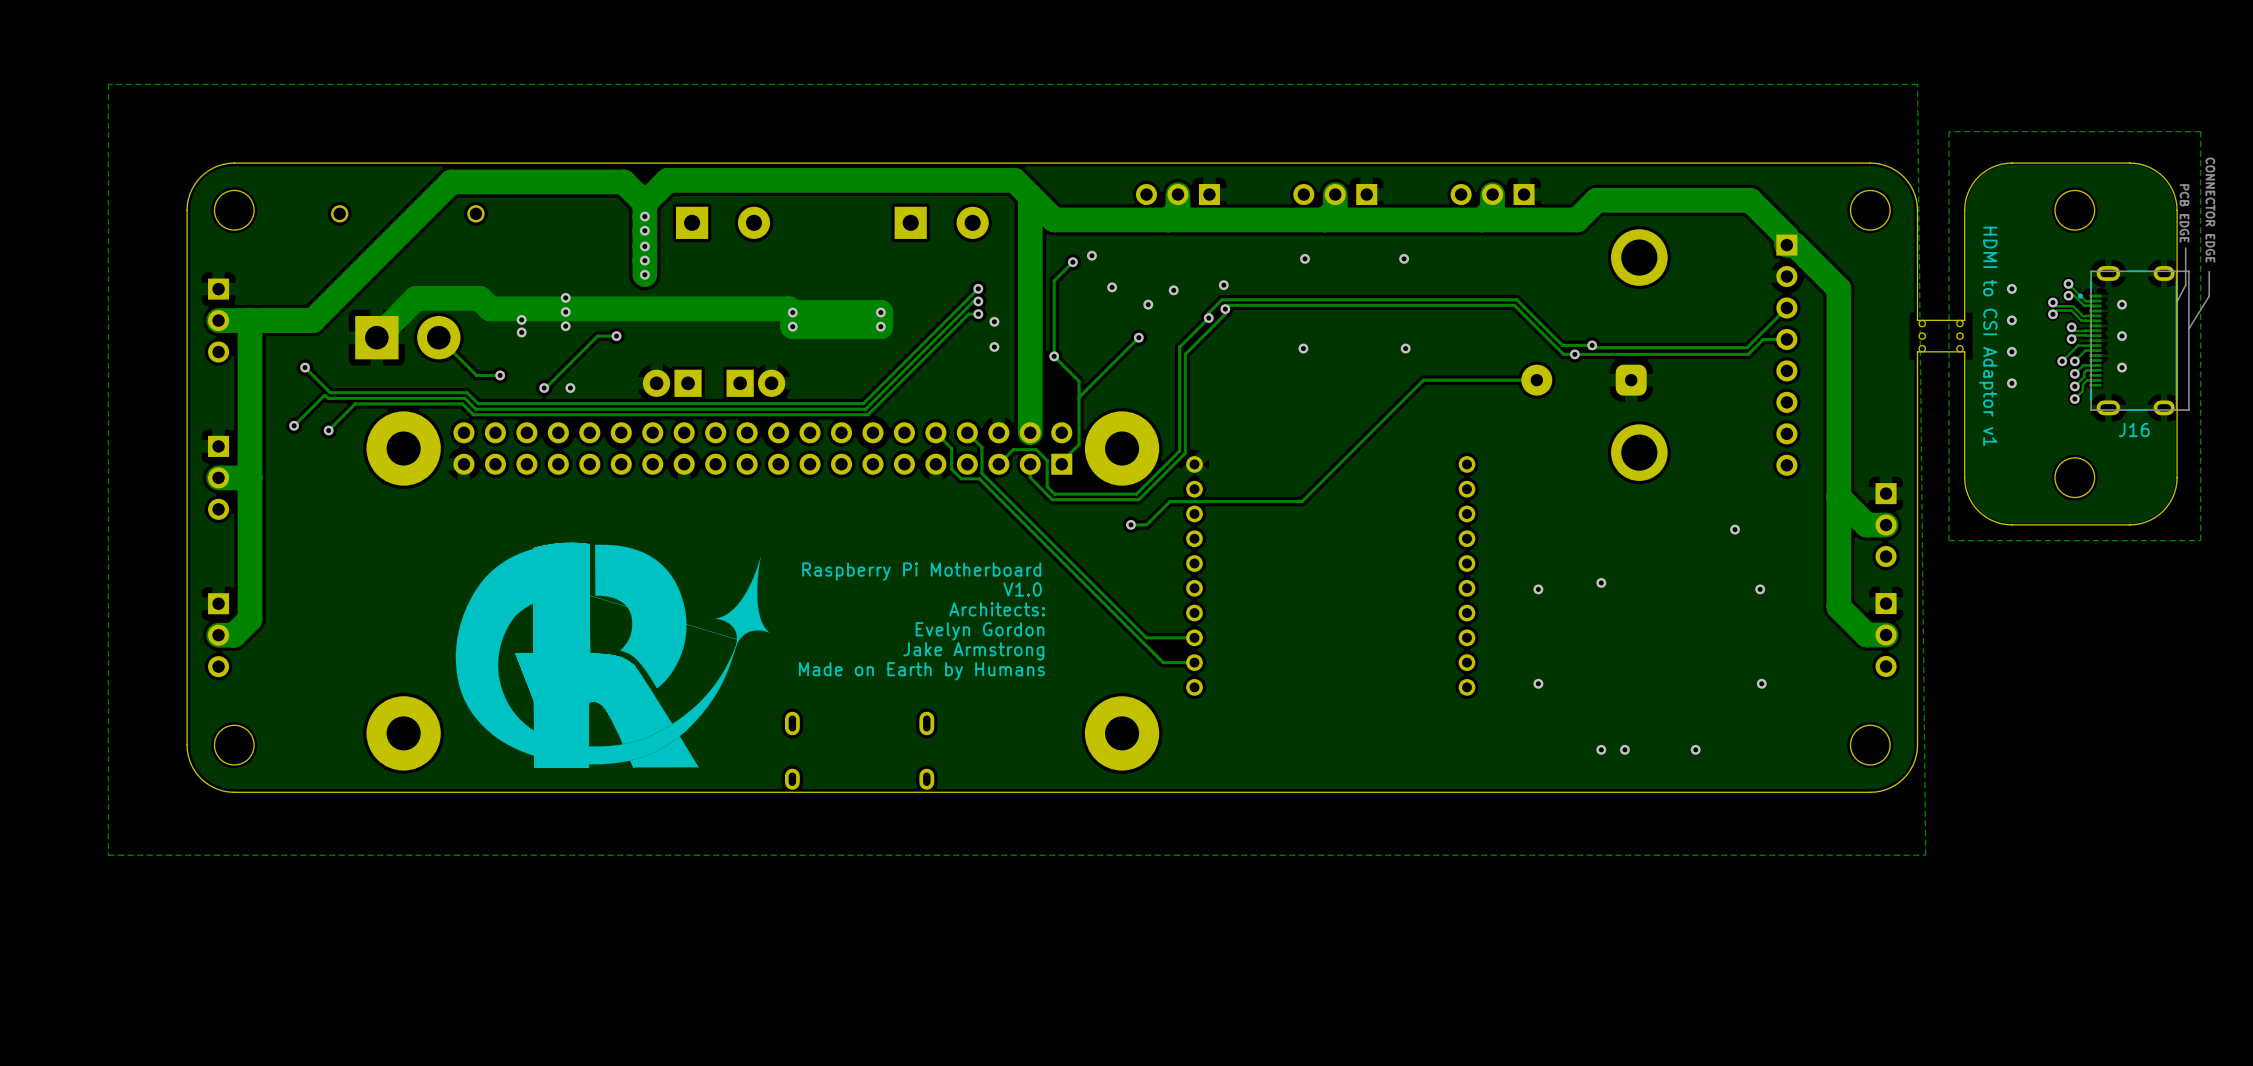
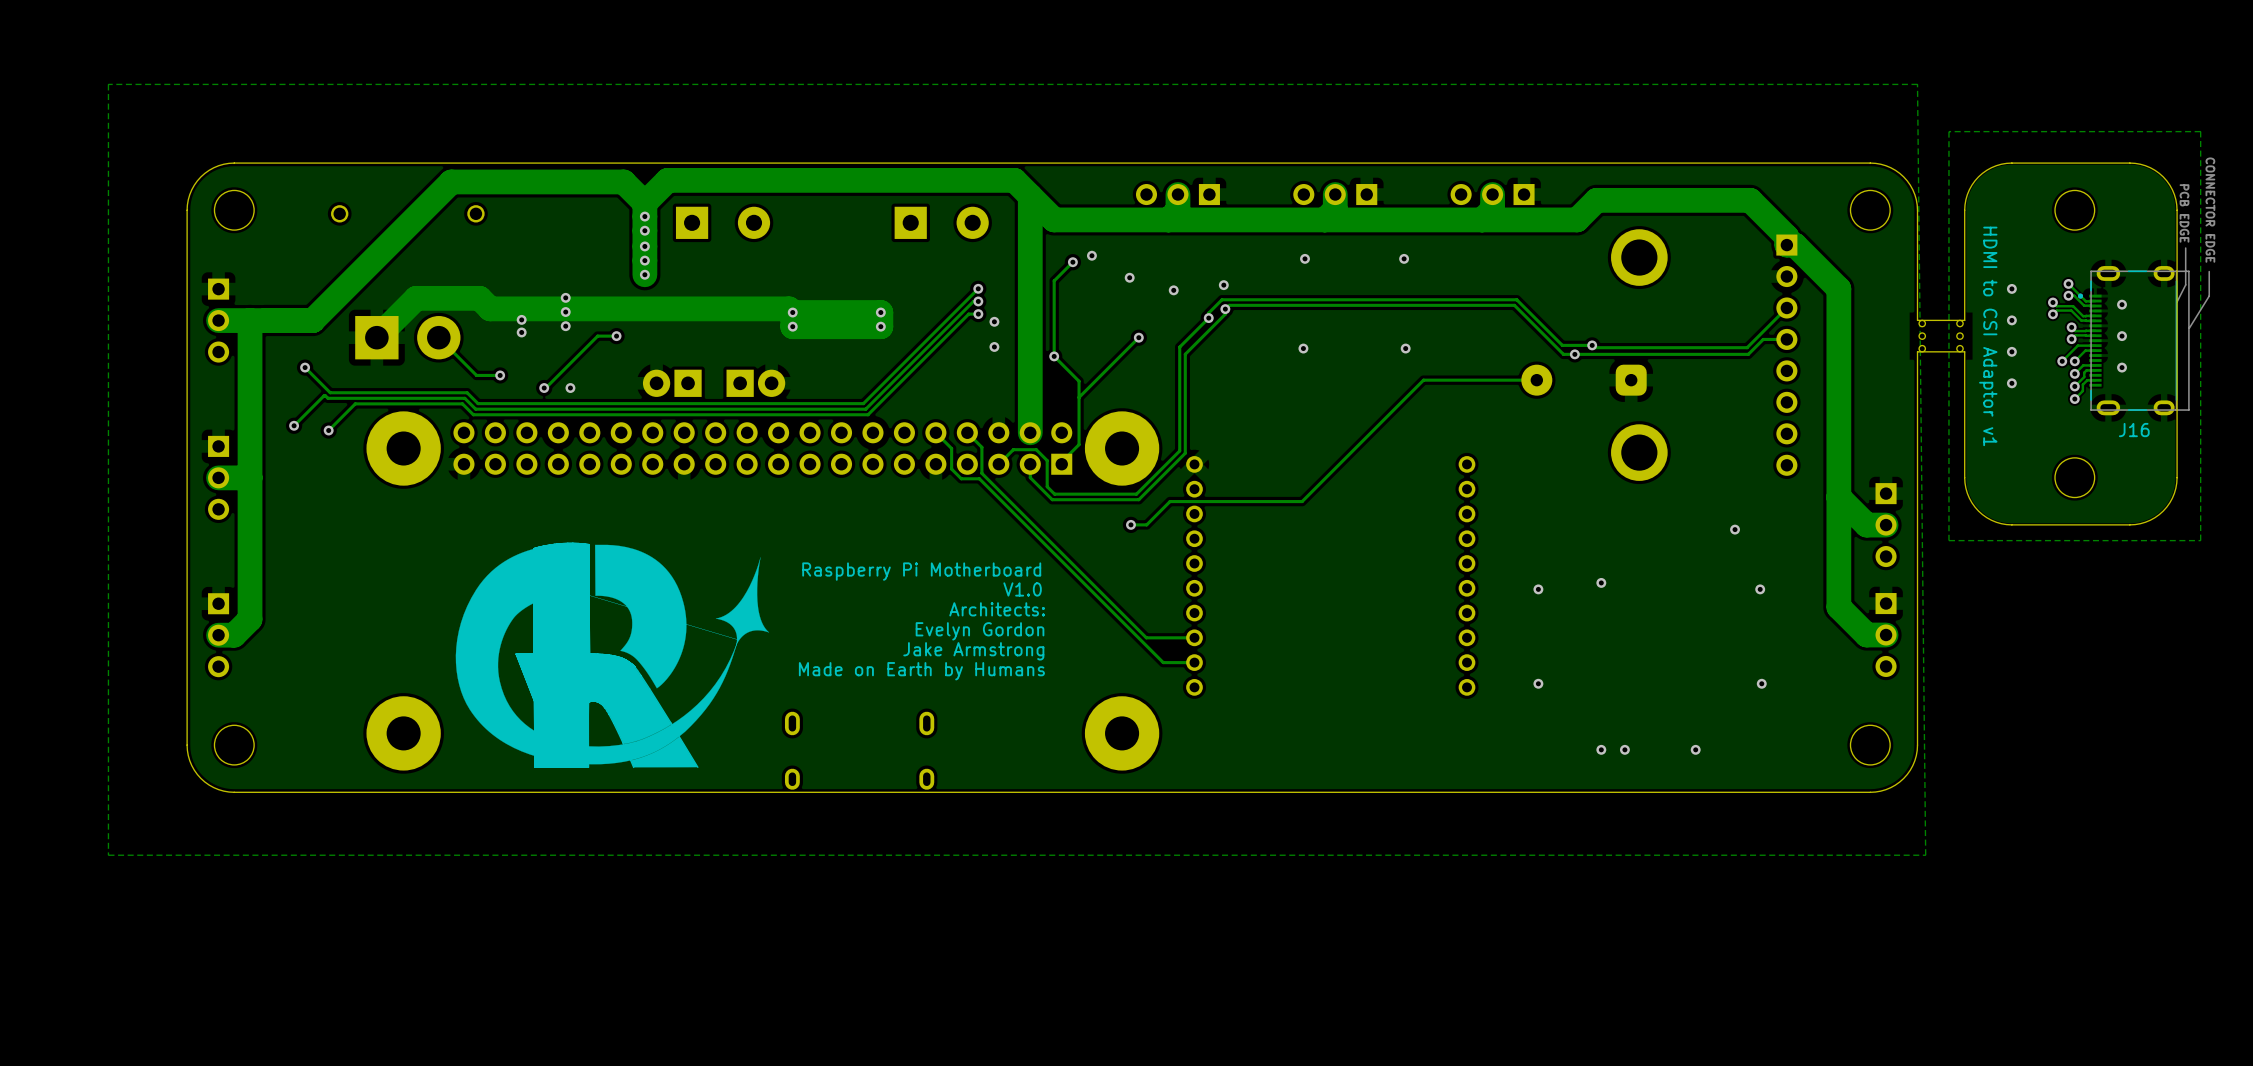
via: none -> (1129, 277)
via: (1112, 287) -> none
via: (1148, 304) -> none

